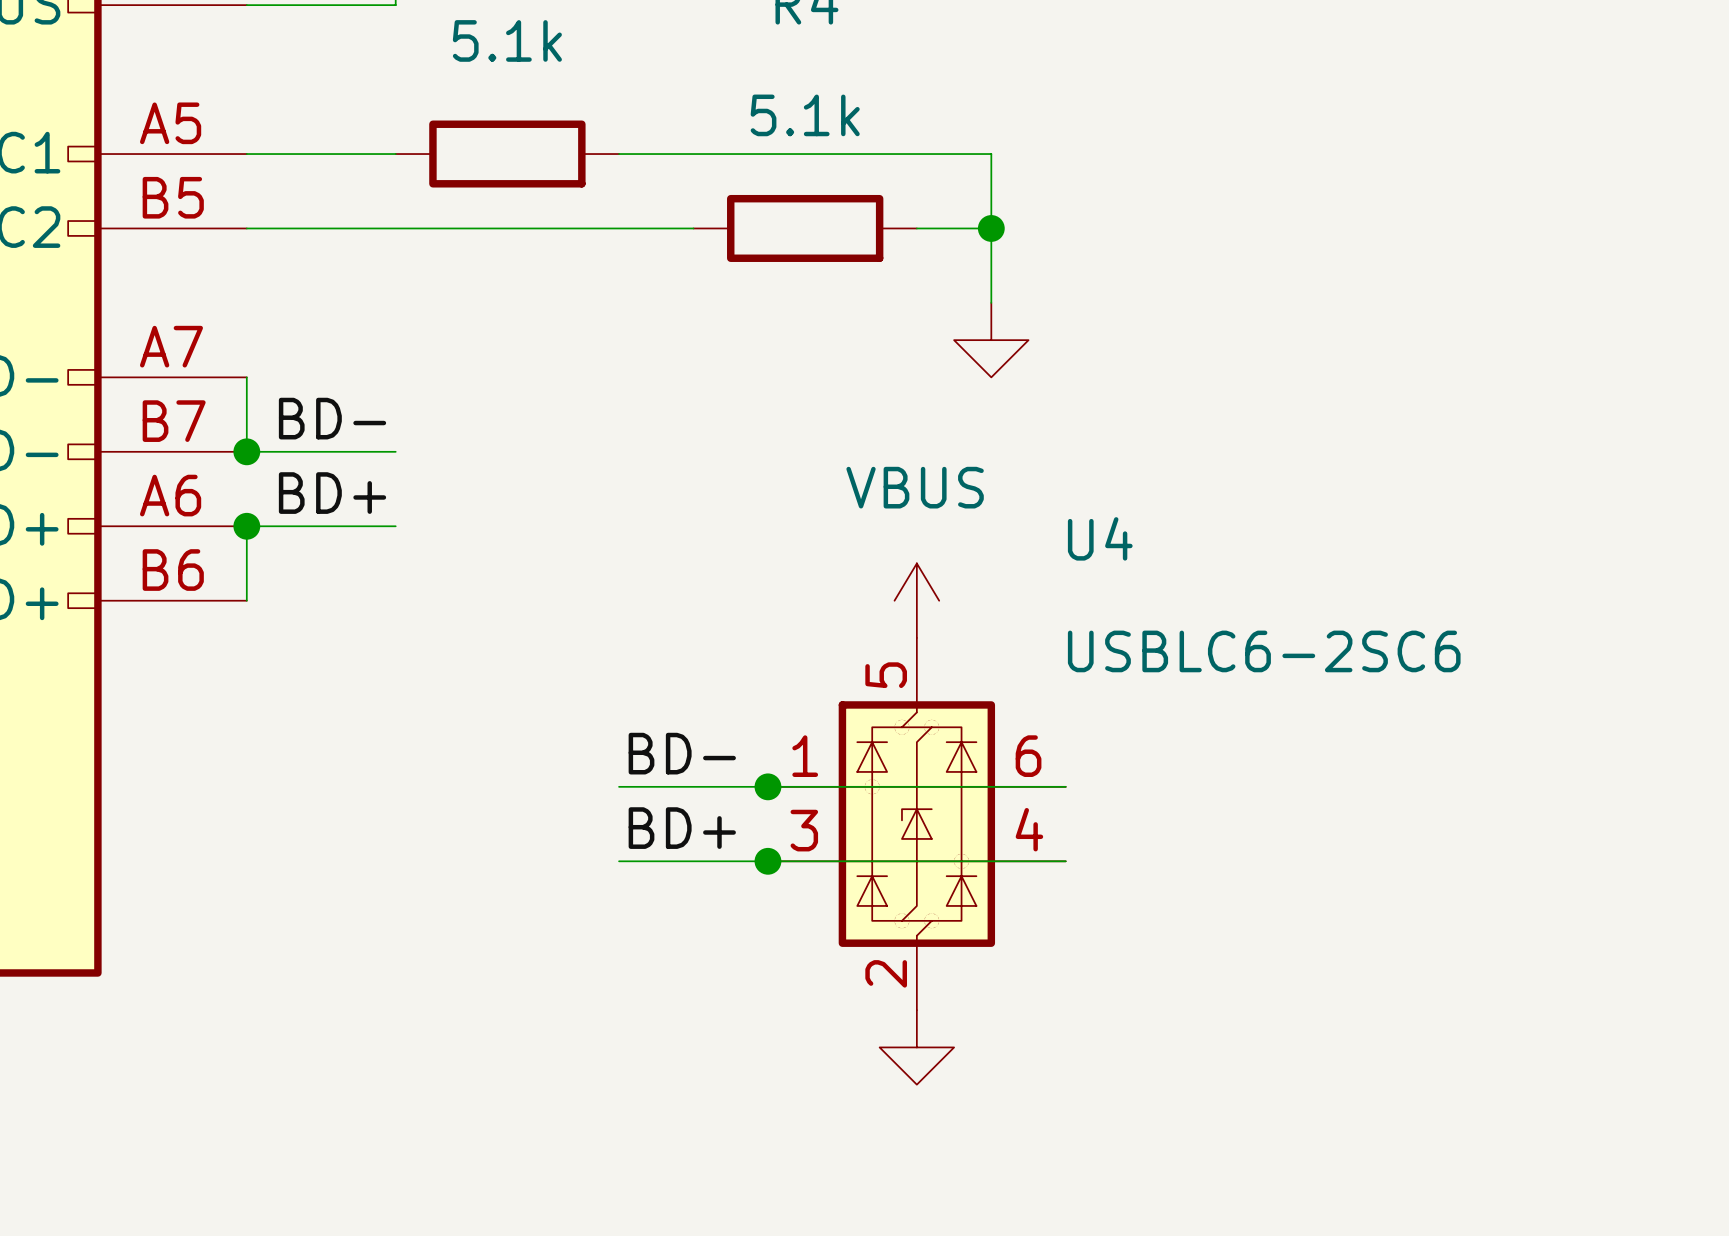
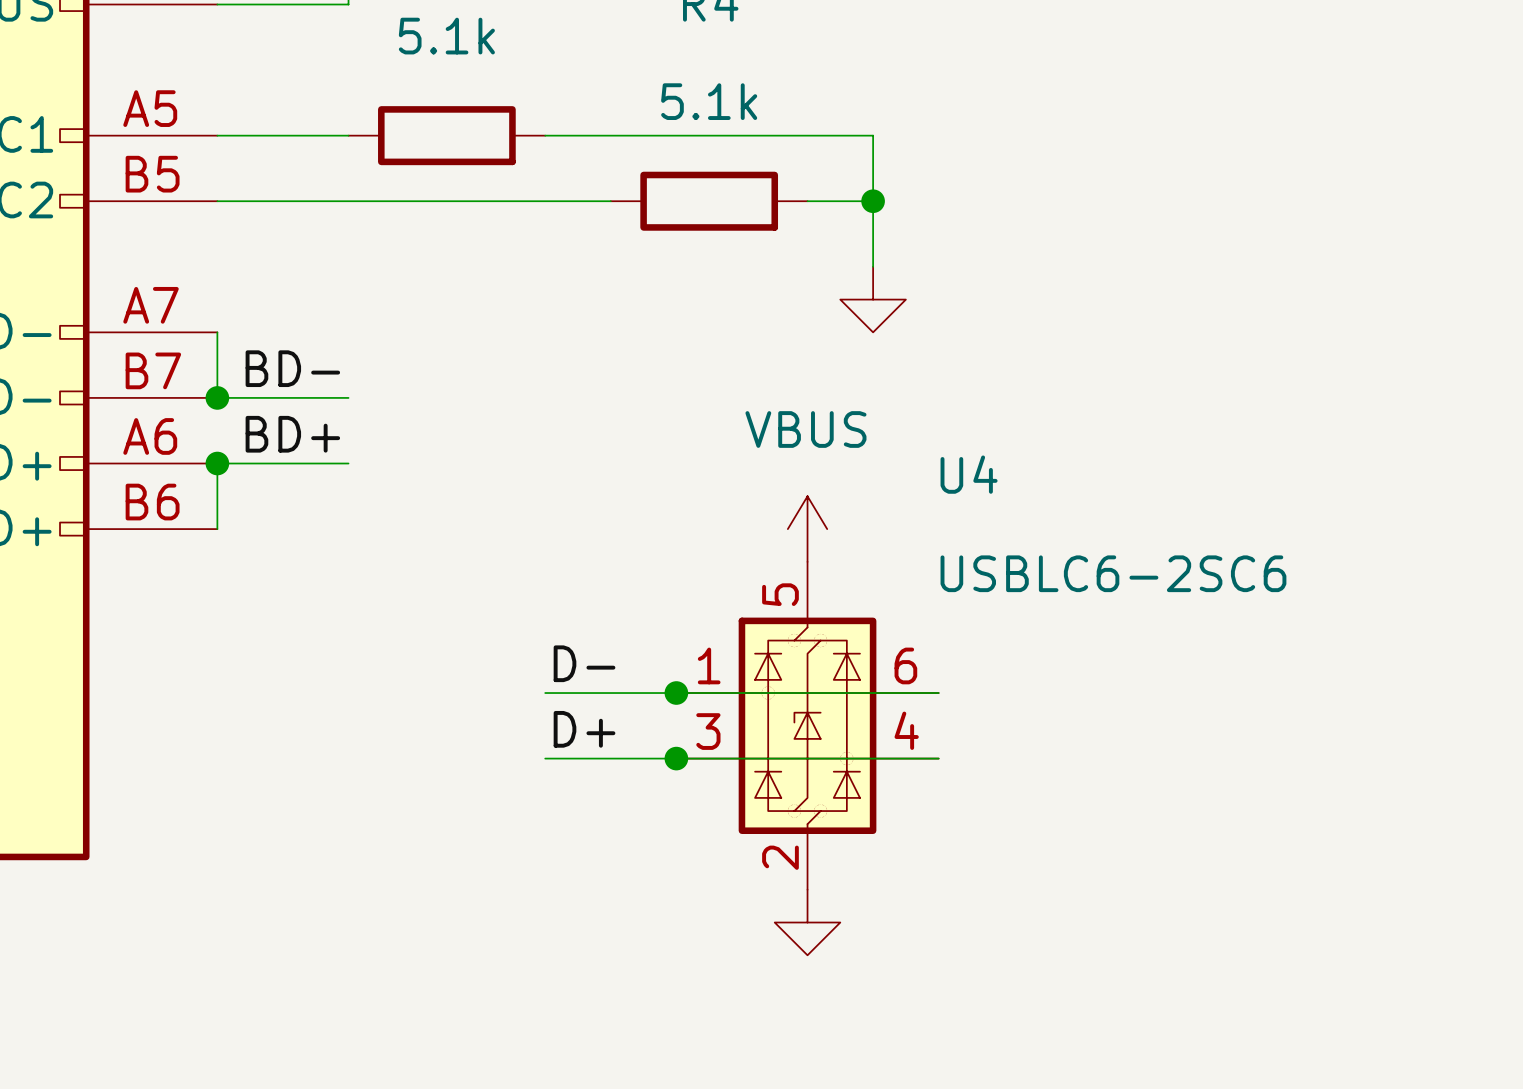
label: BD- (682, 753) -> D- (584, 663)
label: BD+ (682, 828) -> D+ (584, 729)

